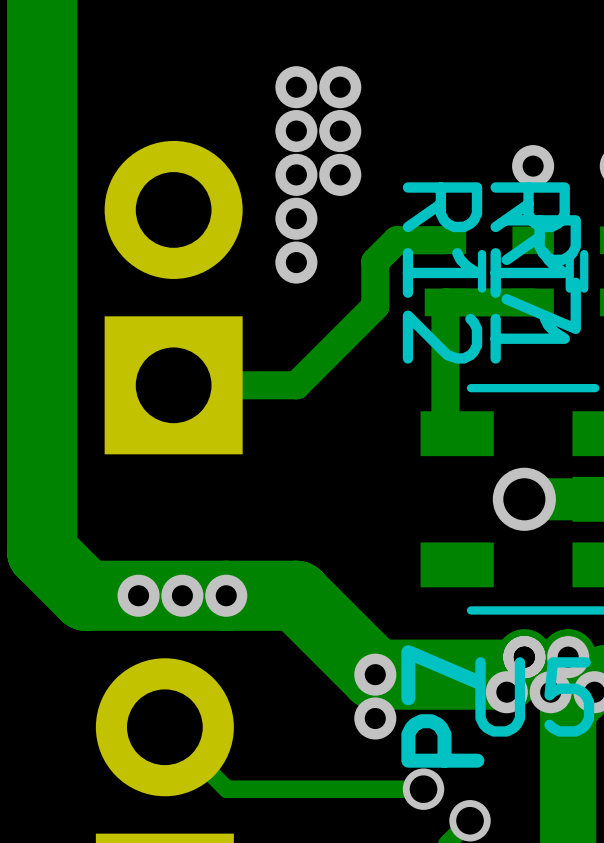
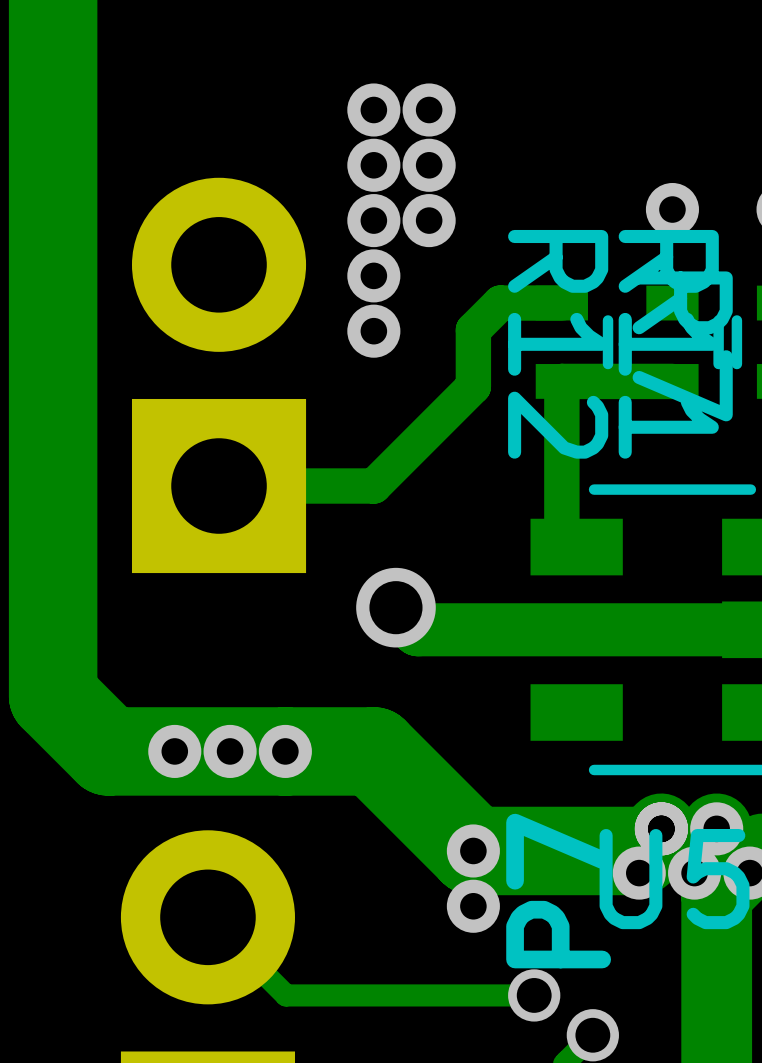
track: none -> (395, 607) (418, 629) (661, 629)
via position: (524, 499) -> (395, 607)

